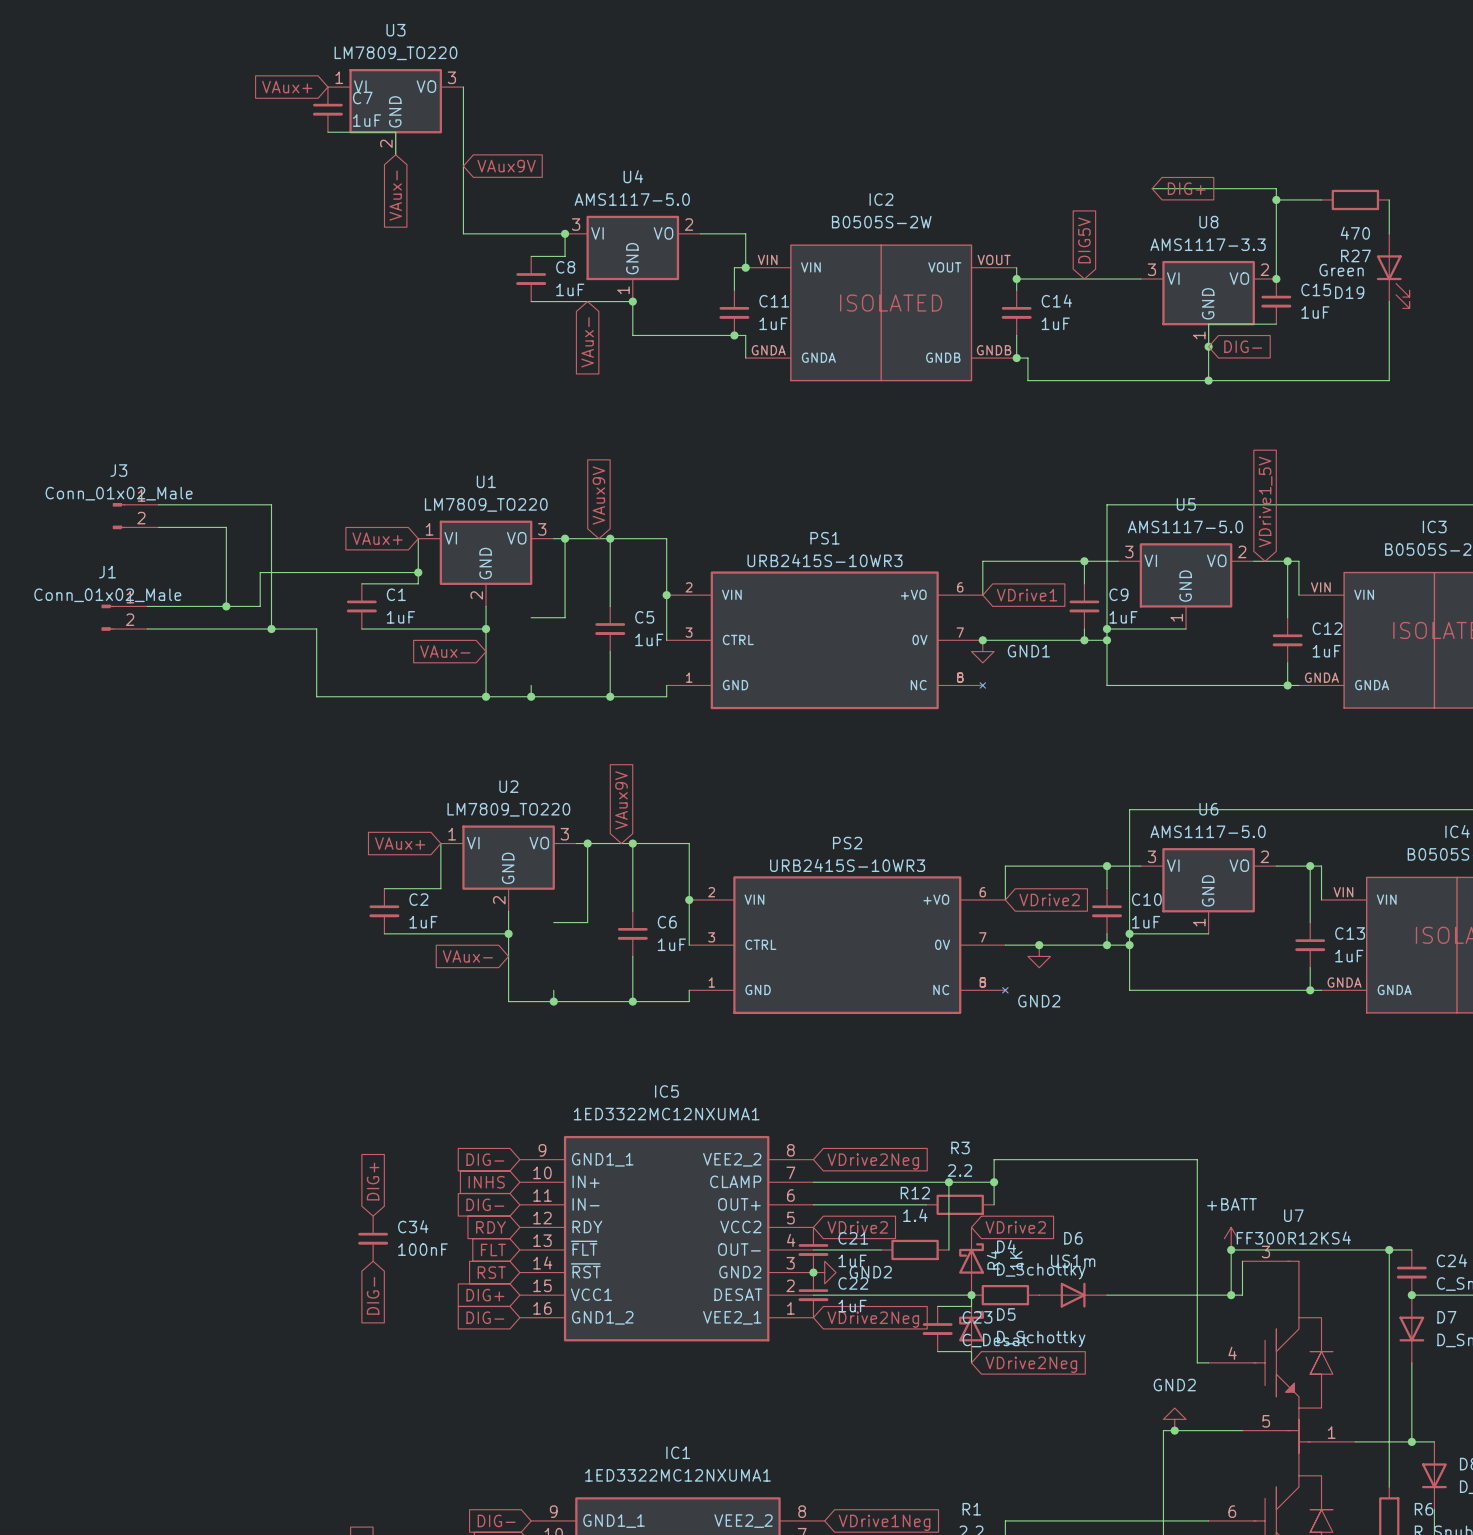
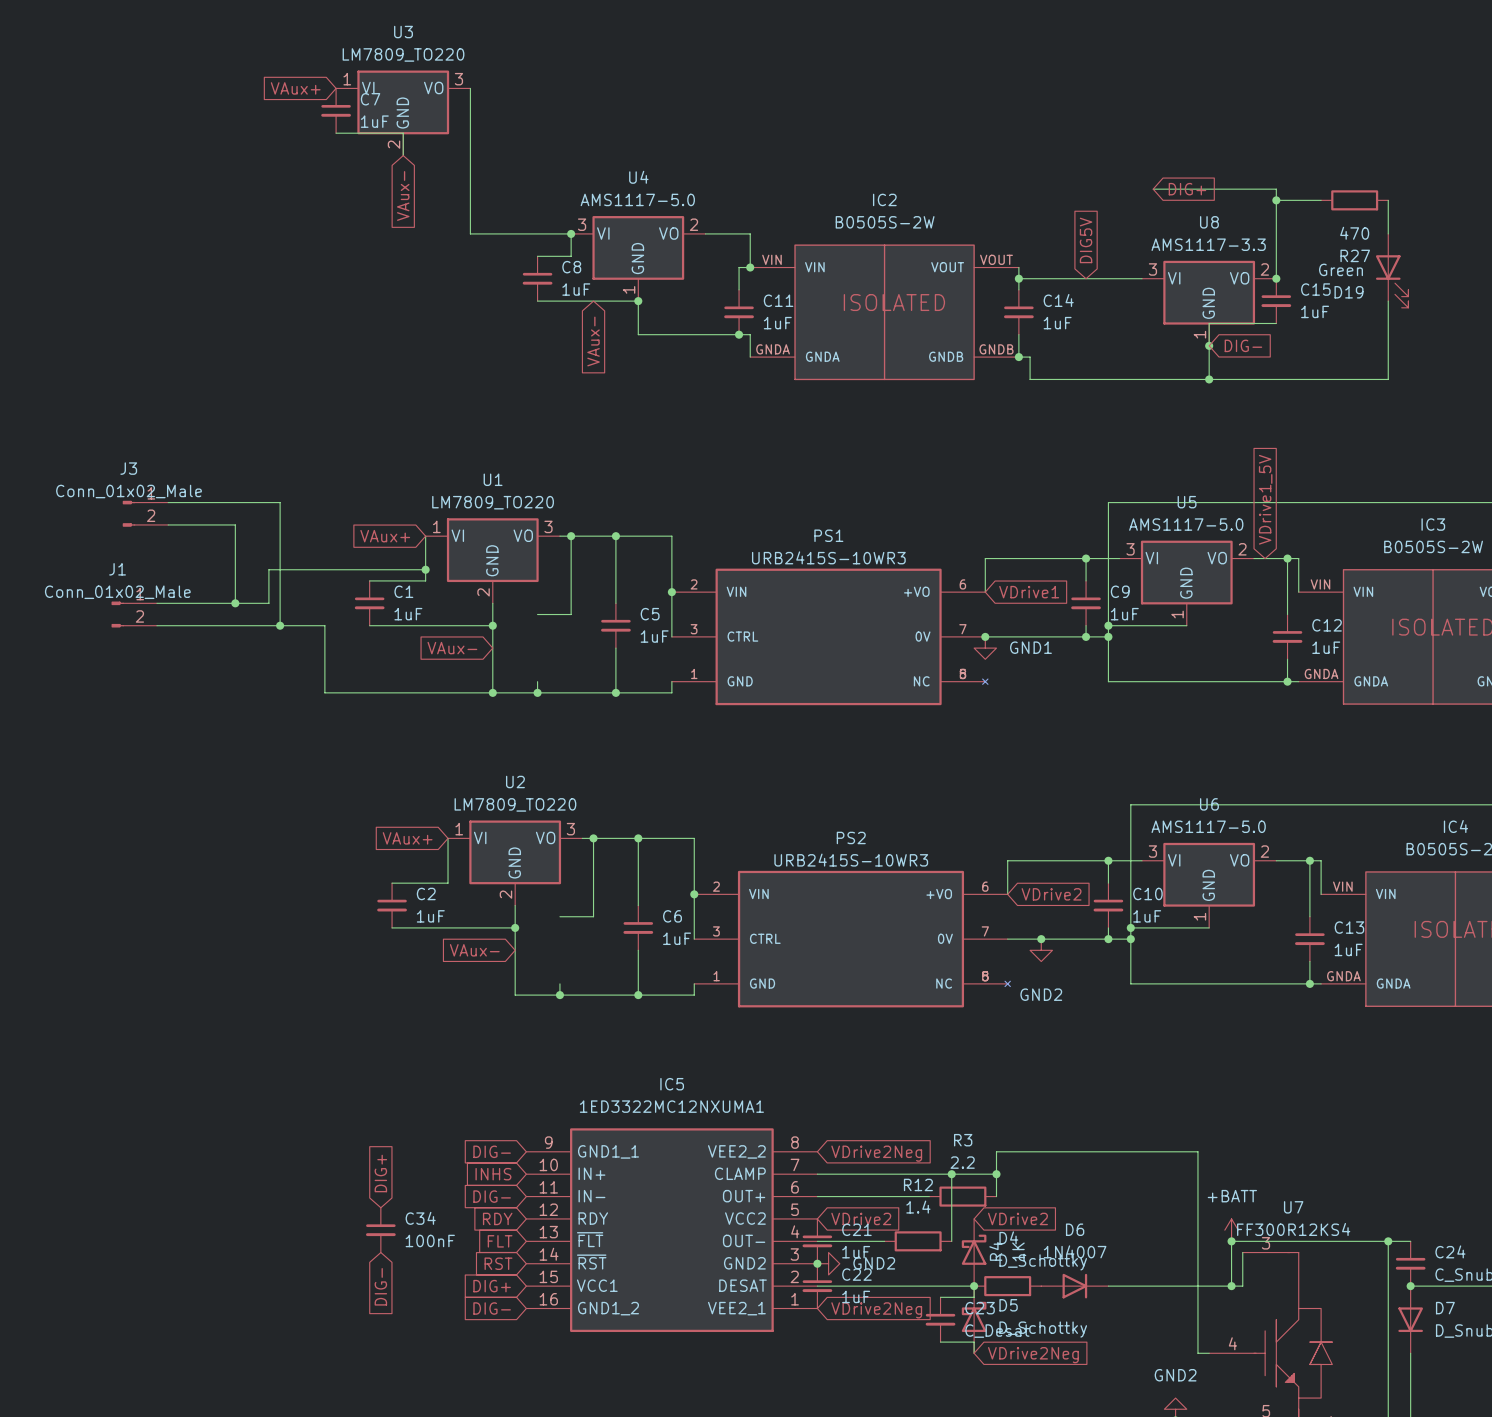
global label: VAux9V (506, 166) -> none
global label: VAux9V (598, 495) -> none
global label: VAux9V (621, 800) -> none
D6 value: US1m (1073, 1260) -> 1N4007 (1075, 1251)

